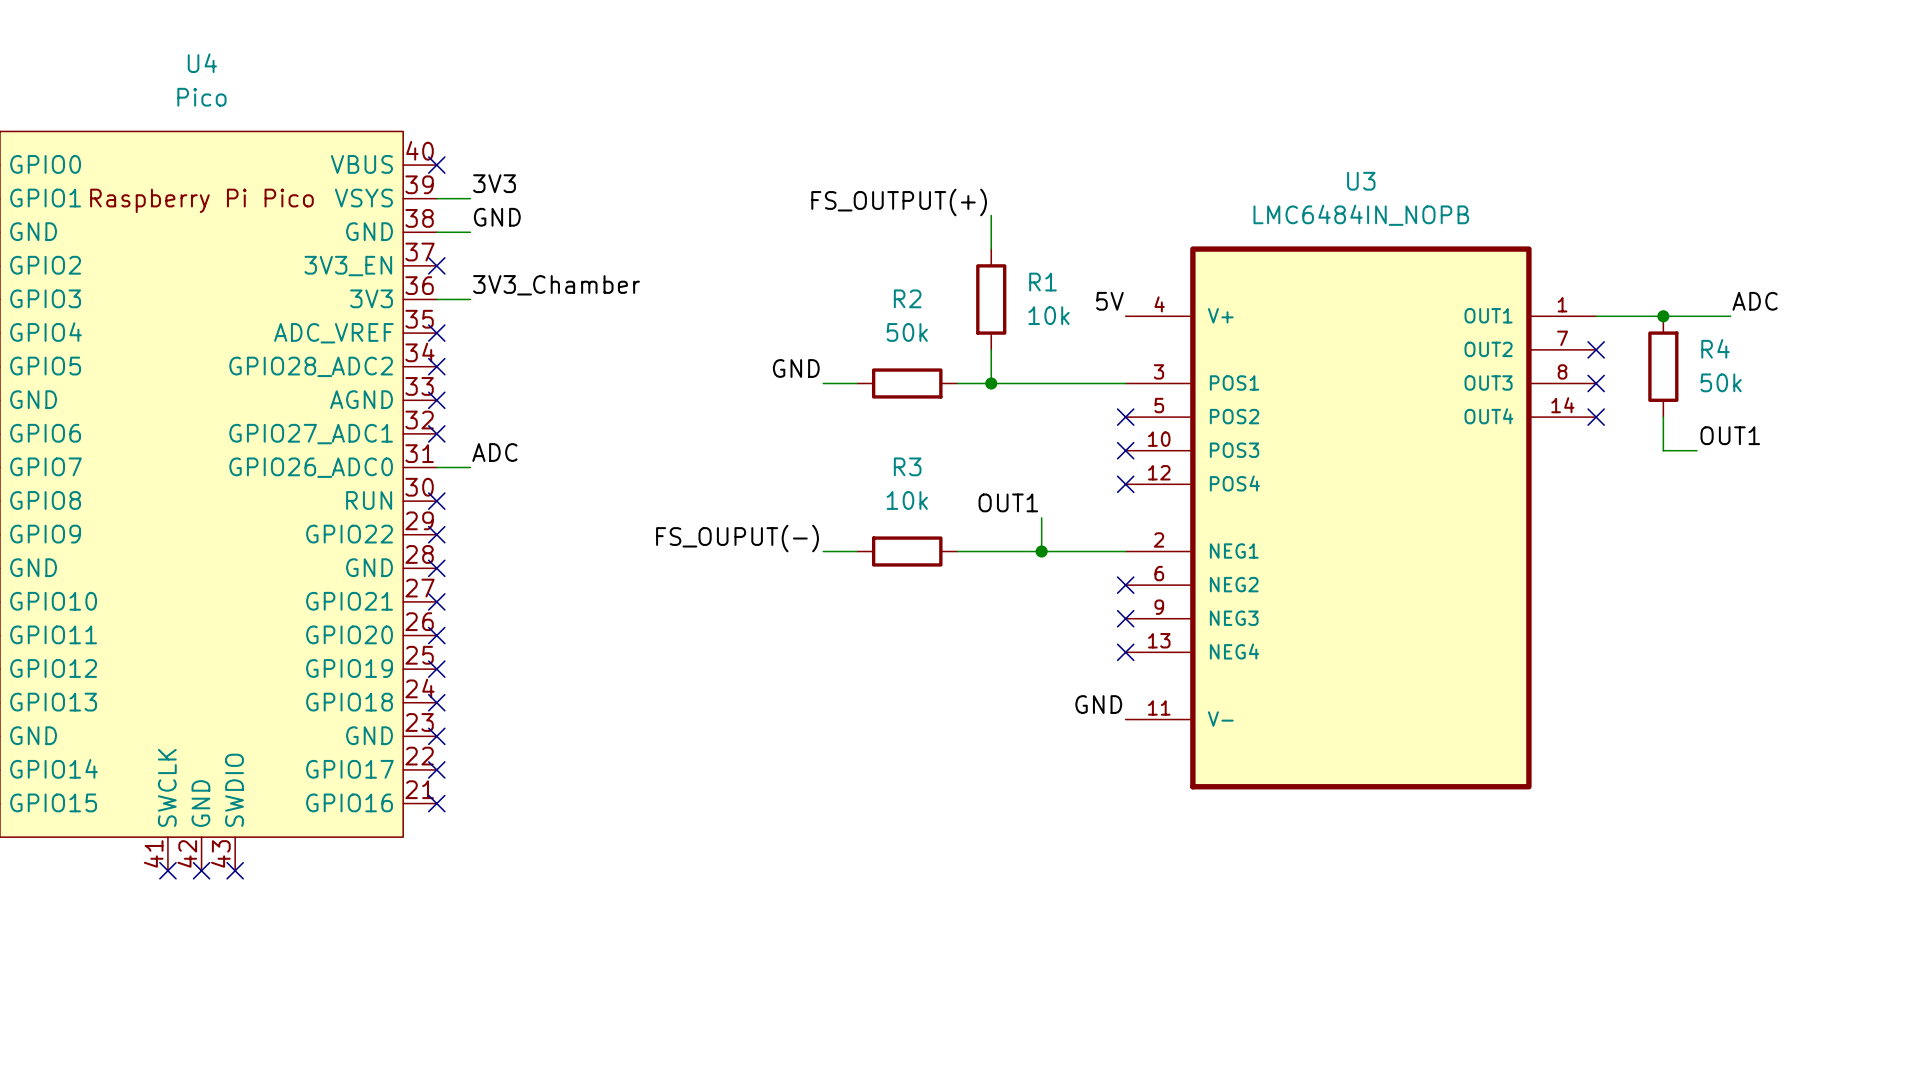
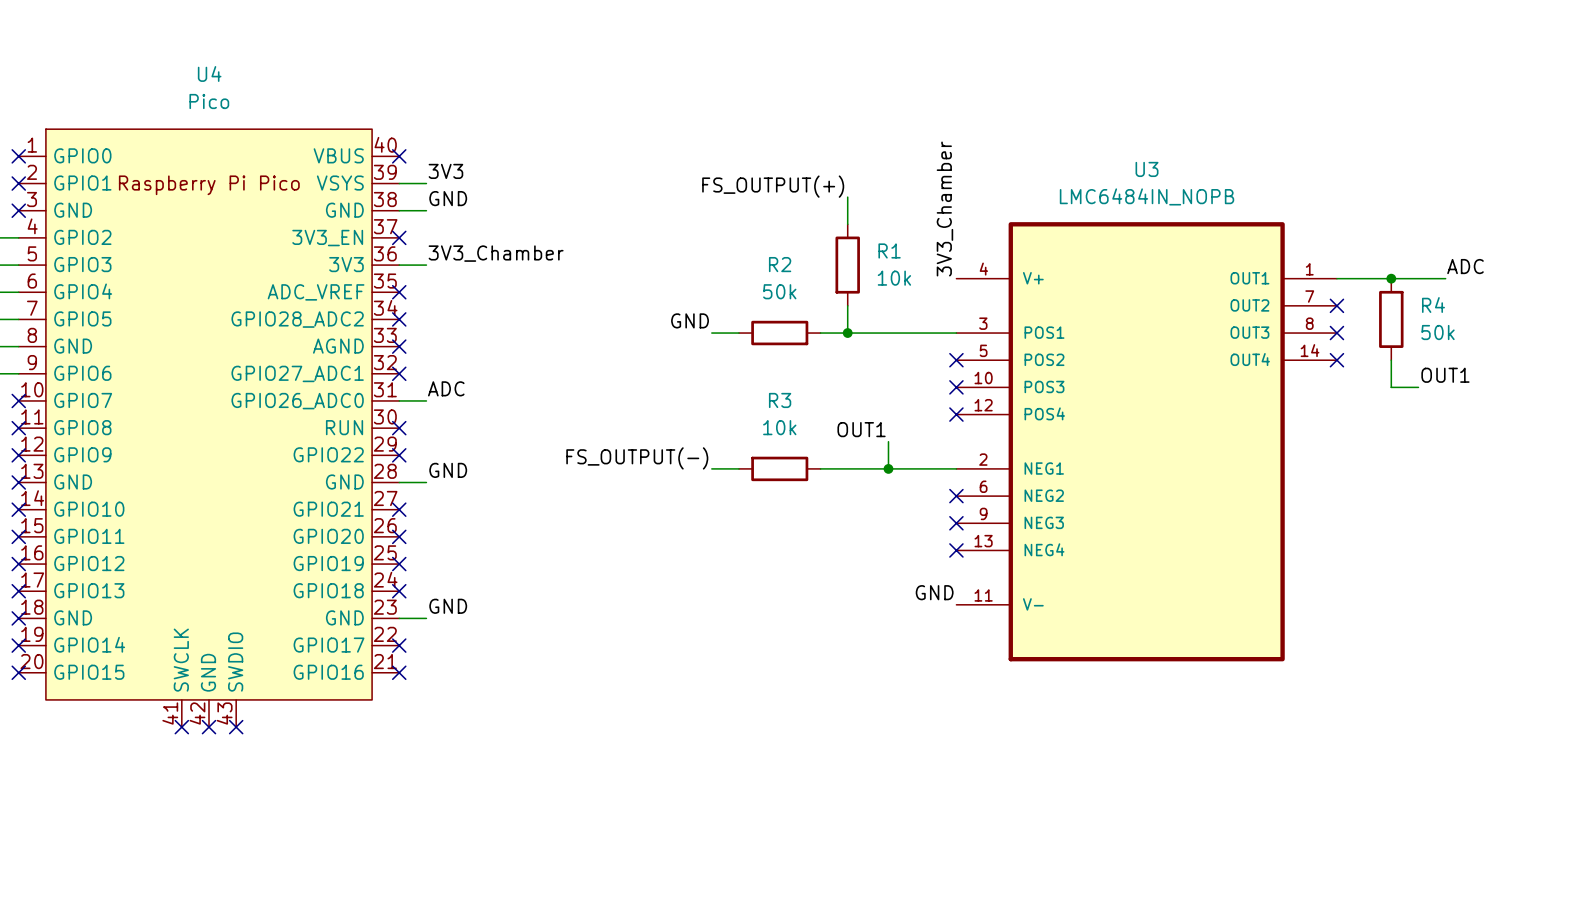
label: 5V (1109, 301) -> 3V3_Chamber (944, 209)
label: FS_OUPUT(-) (737, 538) -> FS_OUTPUT(-) (637, 458)
label: none -> GND (448, 470)
wire: none -> (399, 482) (426, 482)
no-connect mark: (436, 568) -> none
label: none -> GND (448, 606)
wire: none -> (399, 618) (426, 618)
no-connect mark: (436, 736) -> none

